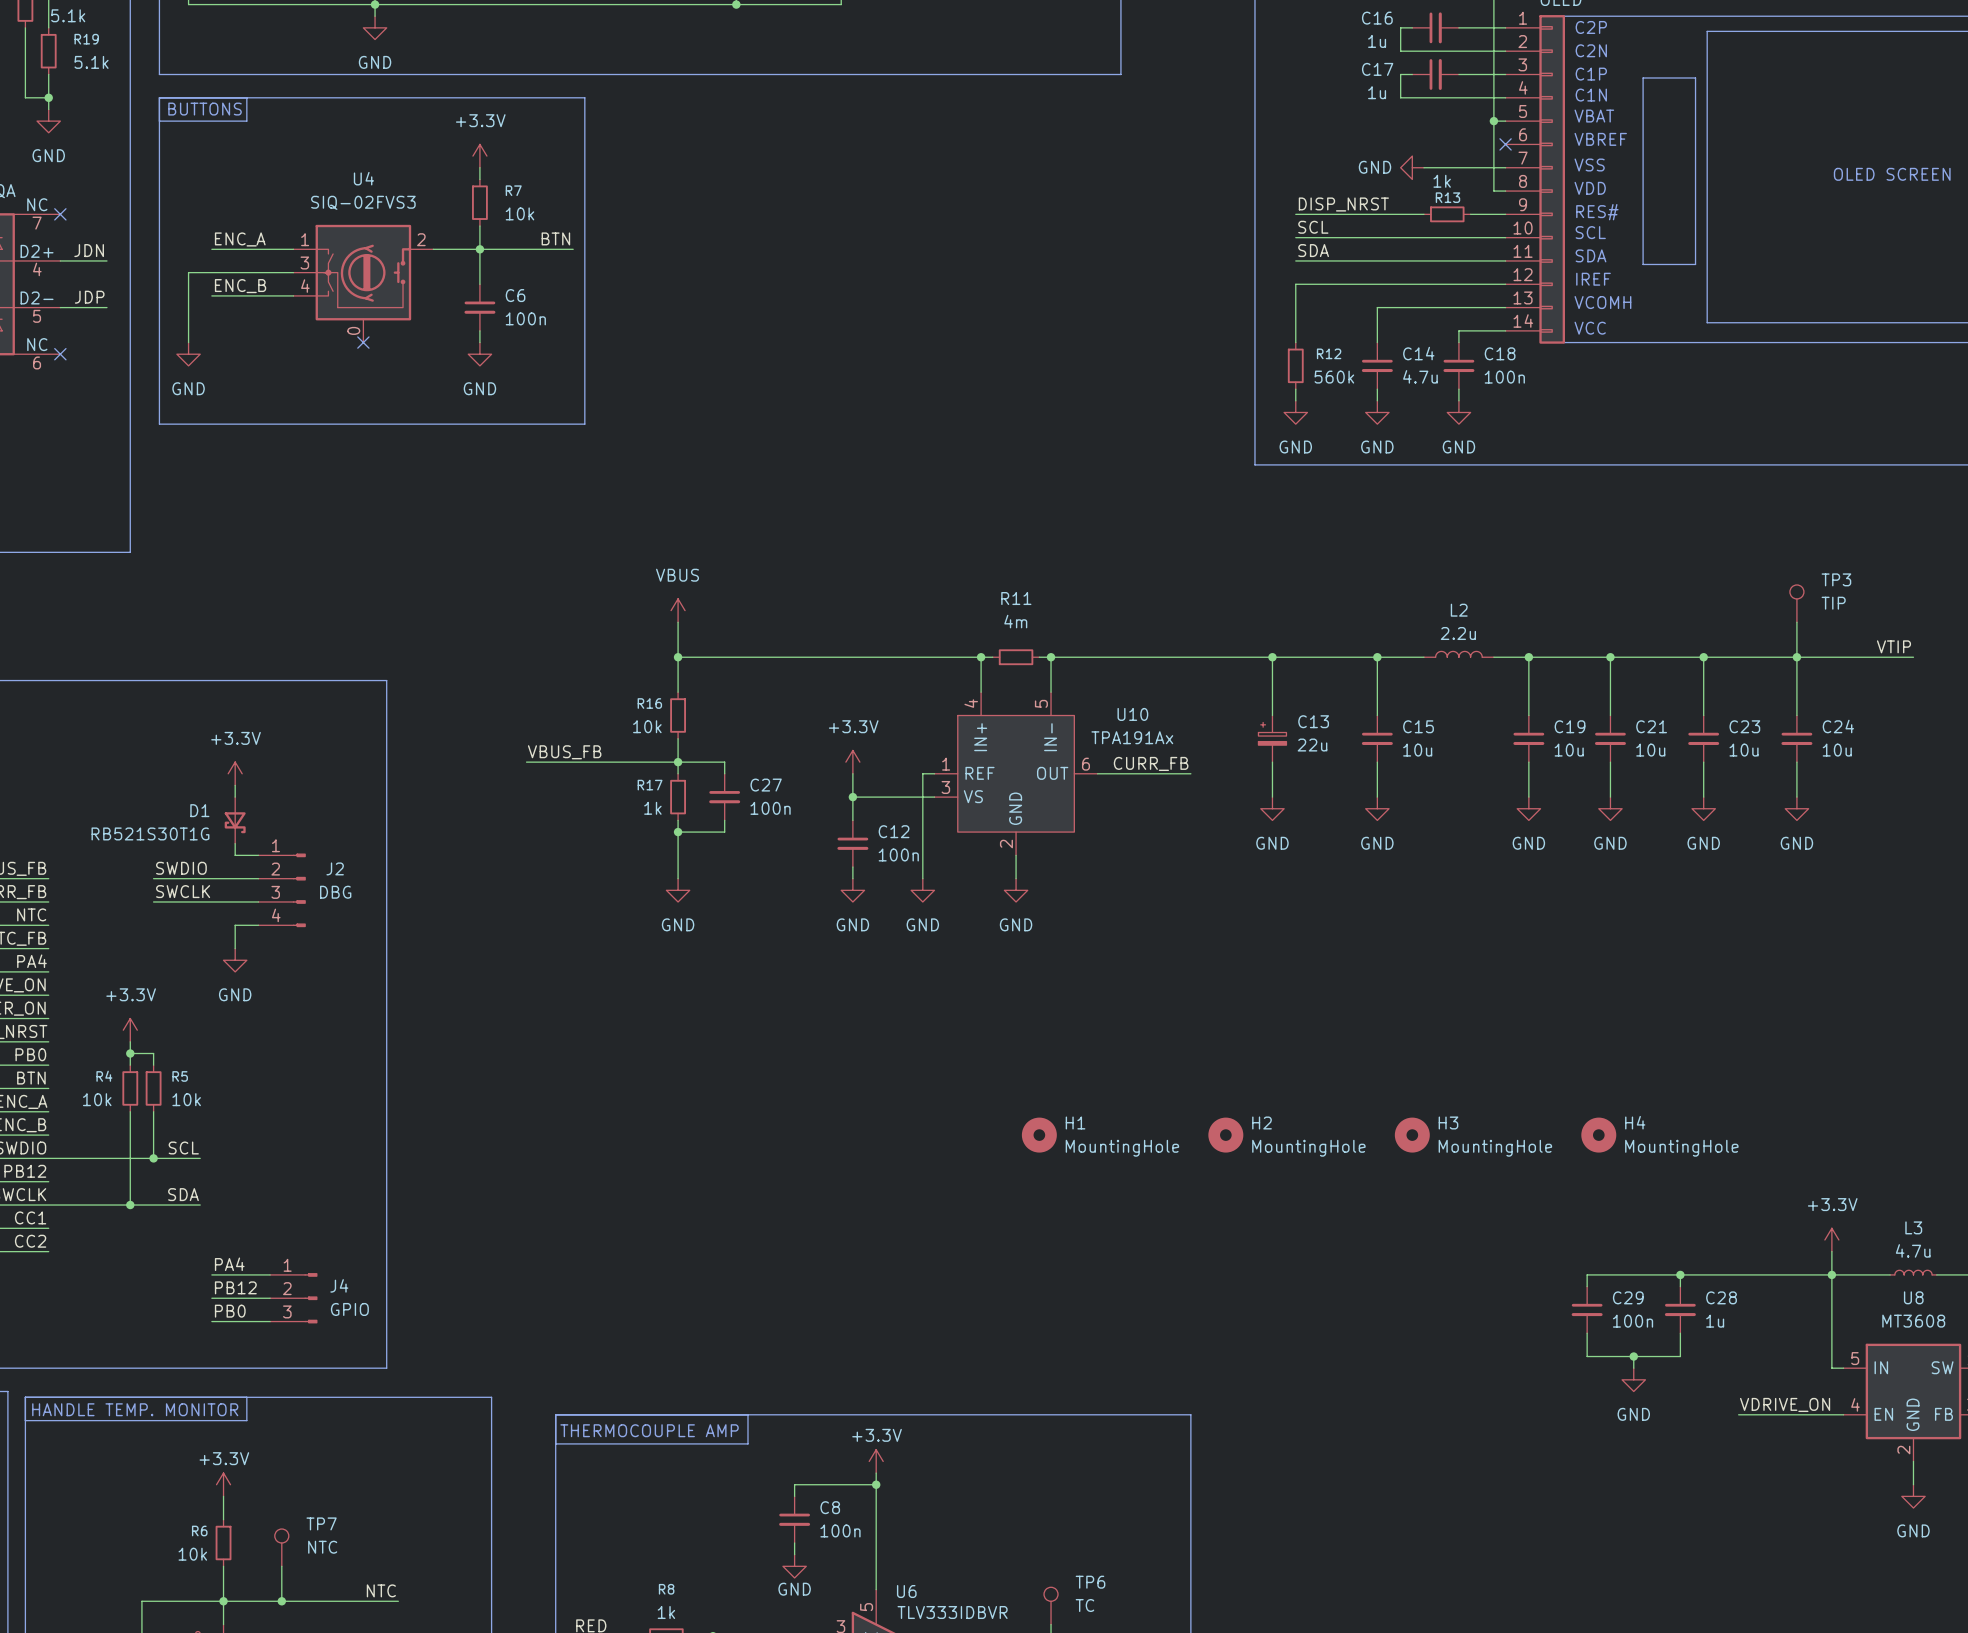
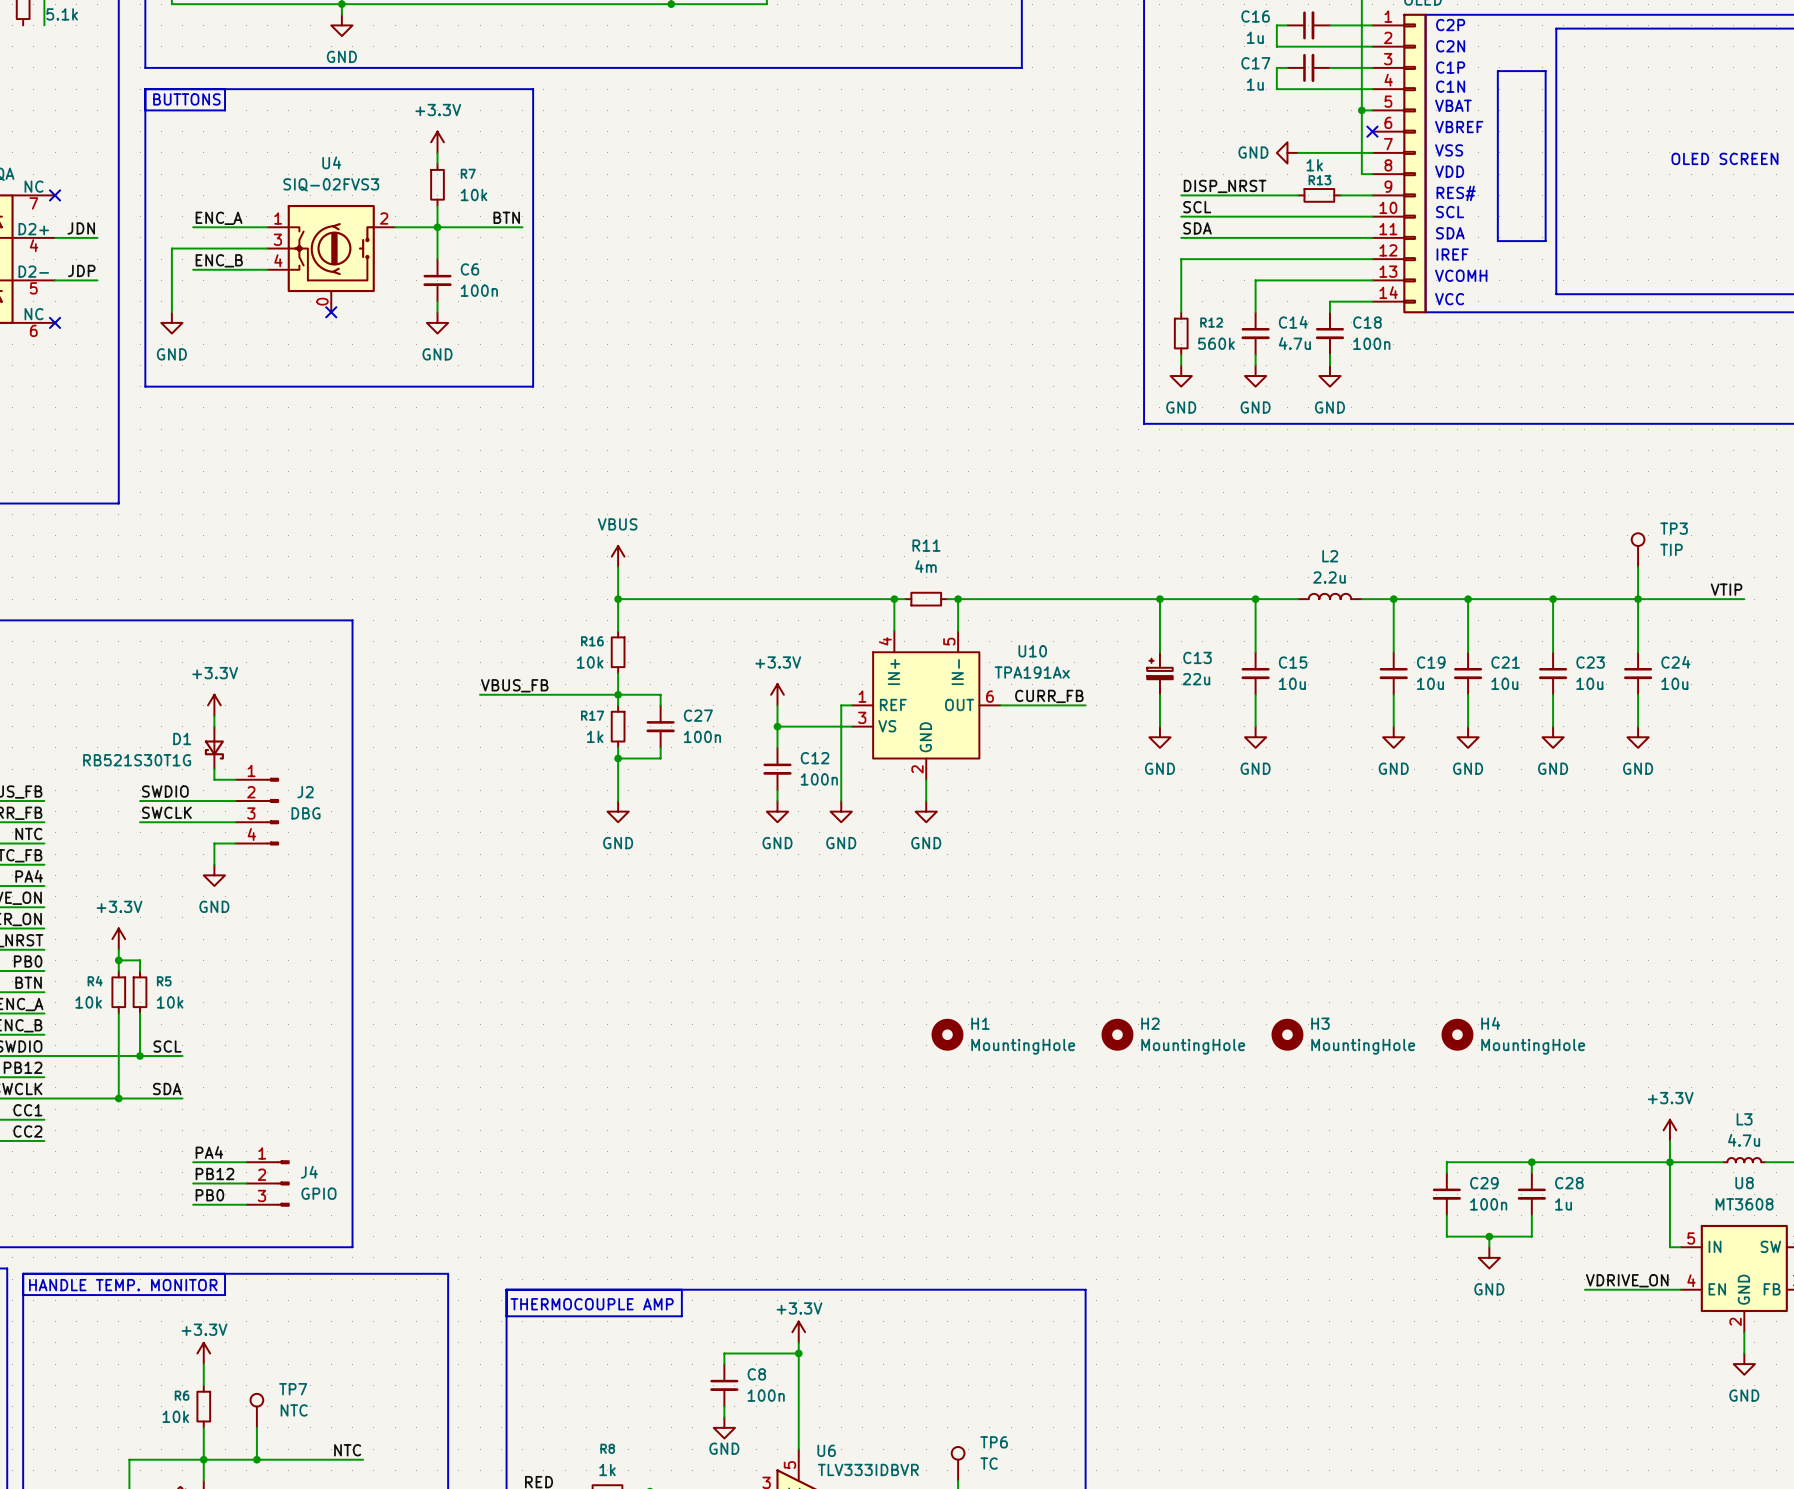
wire: (25, 27) (25, 97) (48, 97) -> none
R19: 5.1k (48, 51) -> none
wire: (48, 74) (48, 109) -> none
junction: (48, 97) -> none
power symbol: GND (48, 121) -> none

